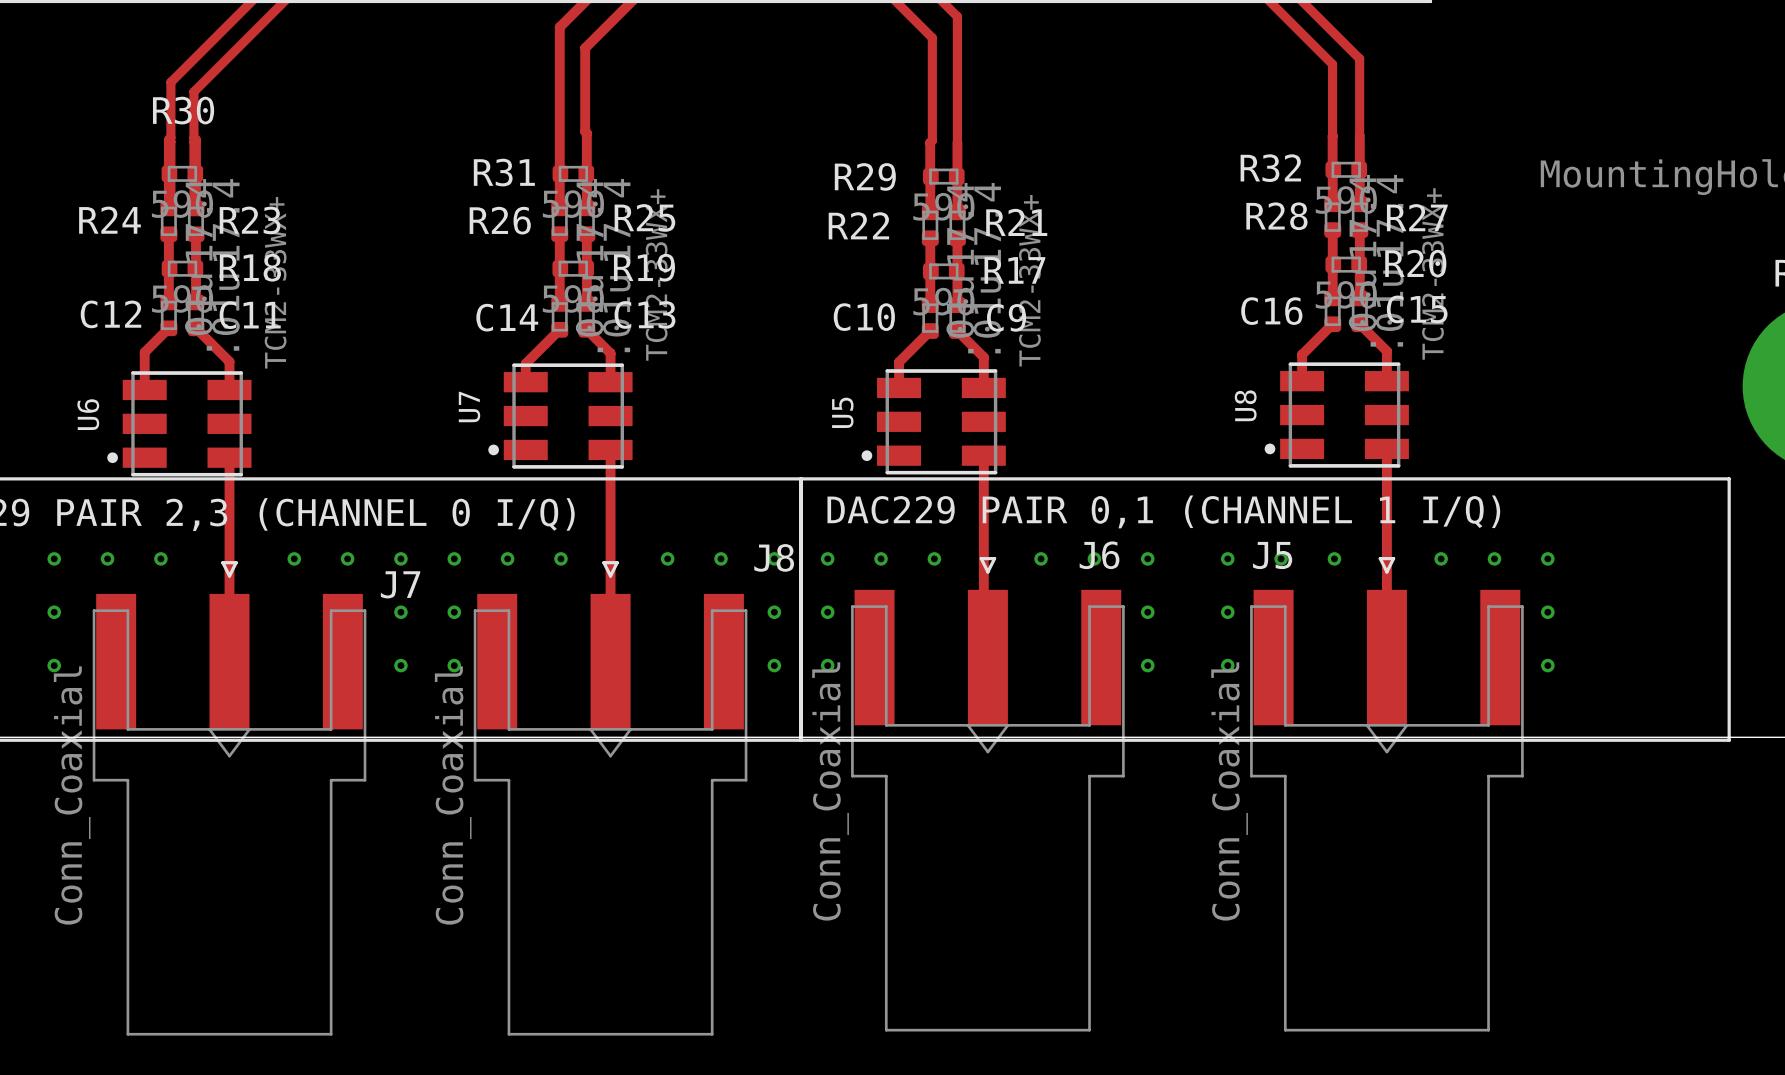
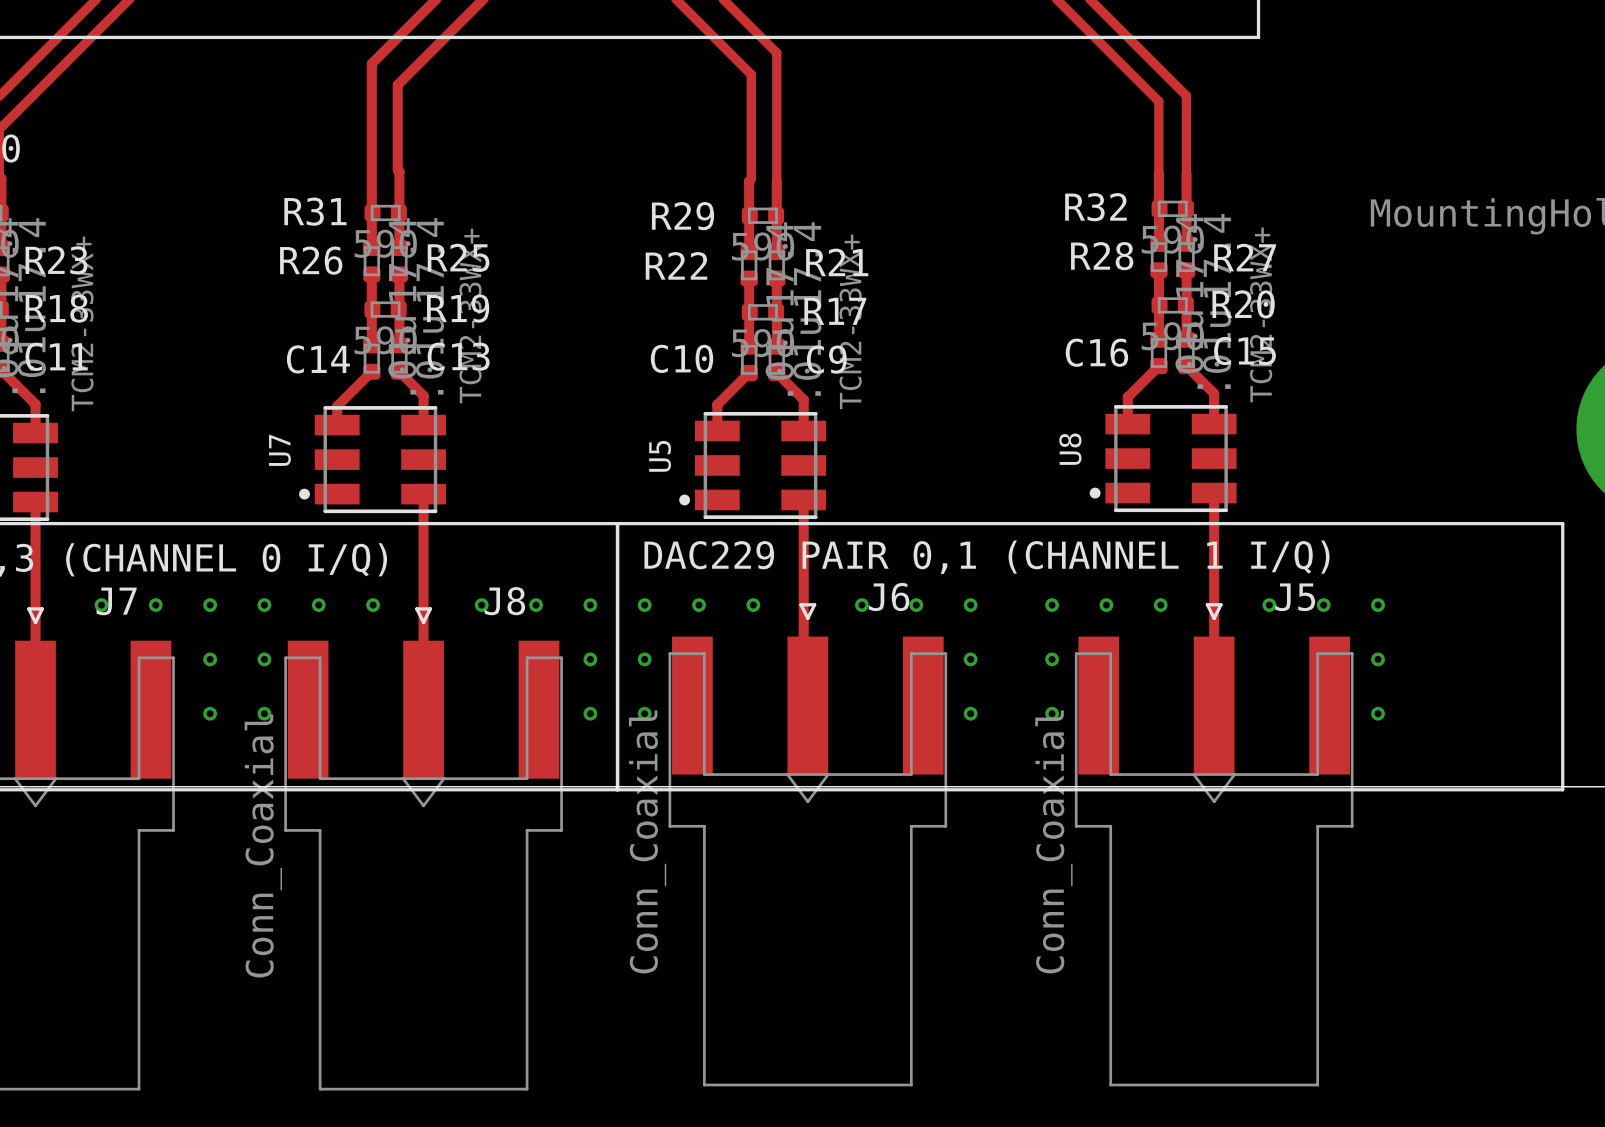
J6 name position: J6 (1099, 555) -> J6 (889, 597)
J5 name position: J5 (1272, 555) -> J5 (1295, 597)
J8 name position: J8 (774, 557) -> J8 (504, 601)
J7 name position: J7 (400, 584) -> J7 (116, 601)

